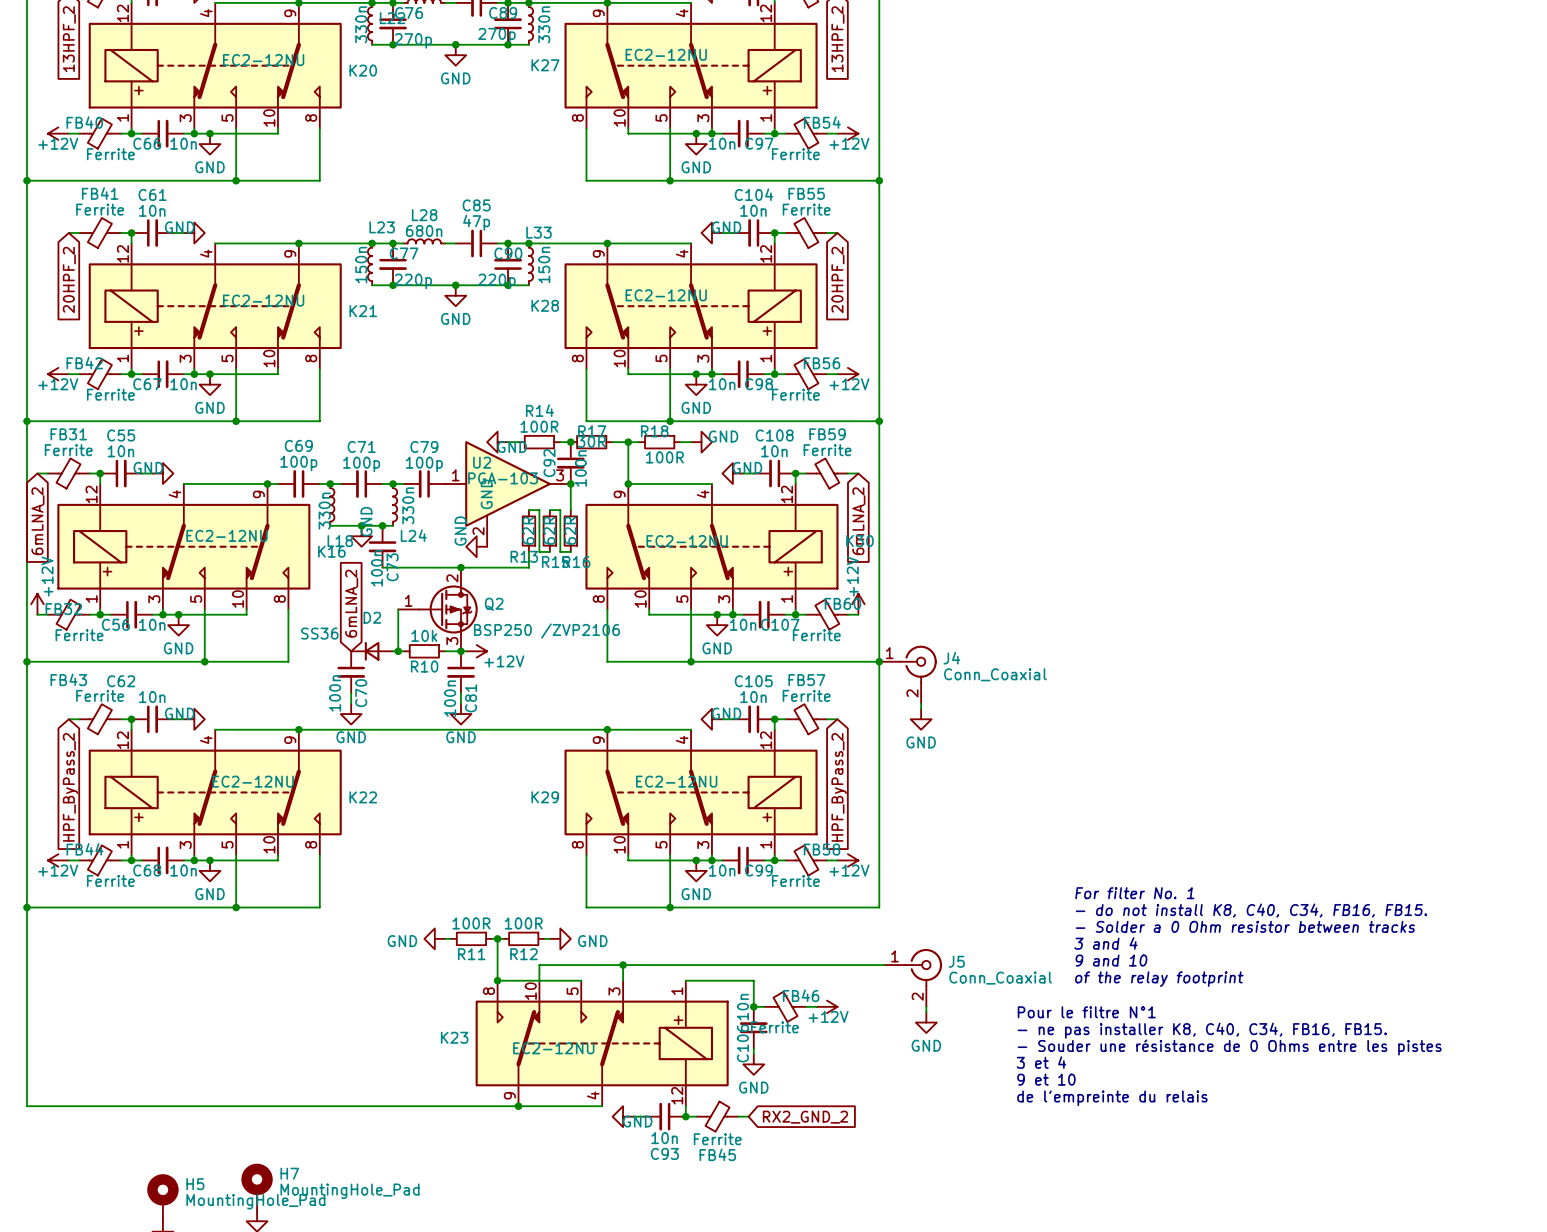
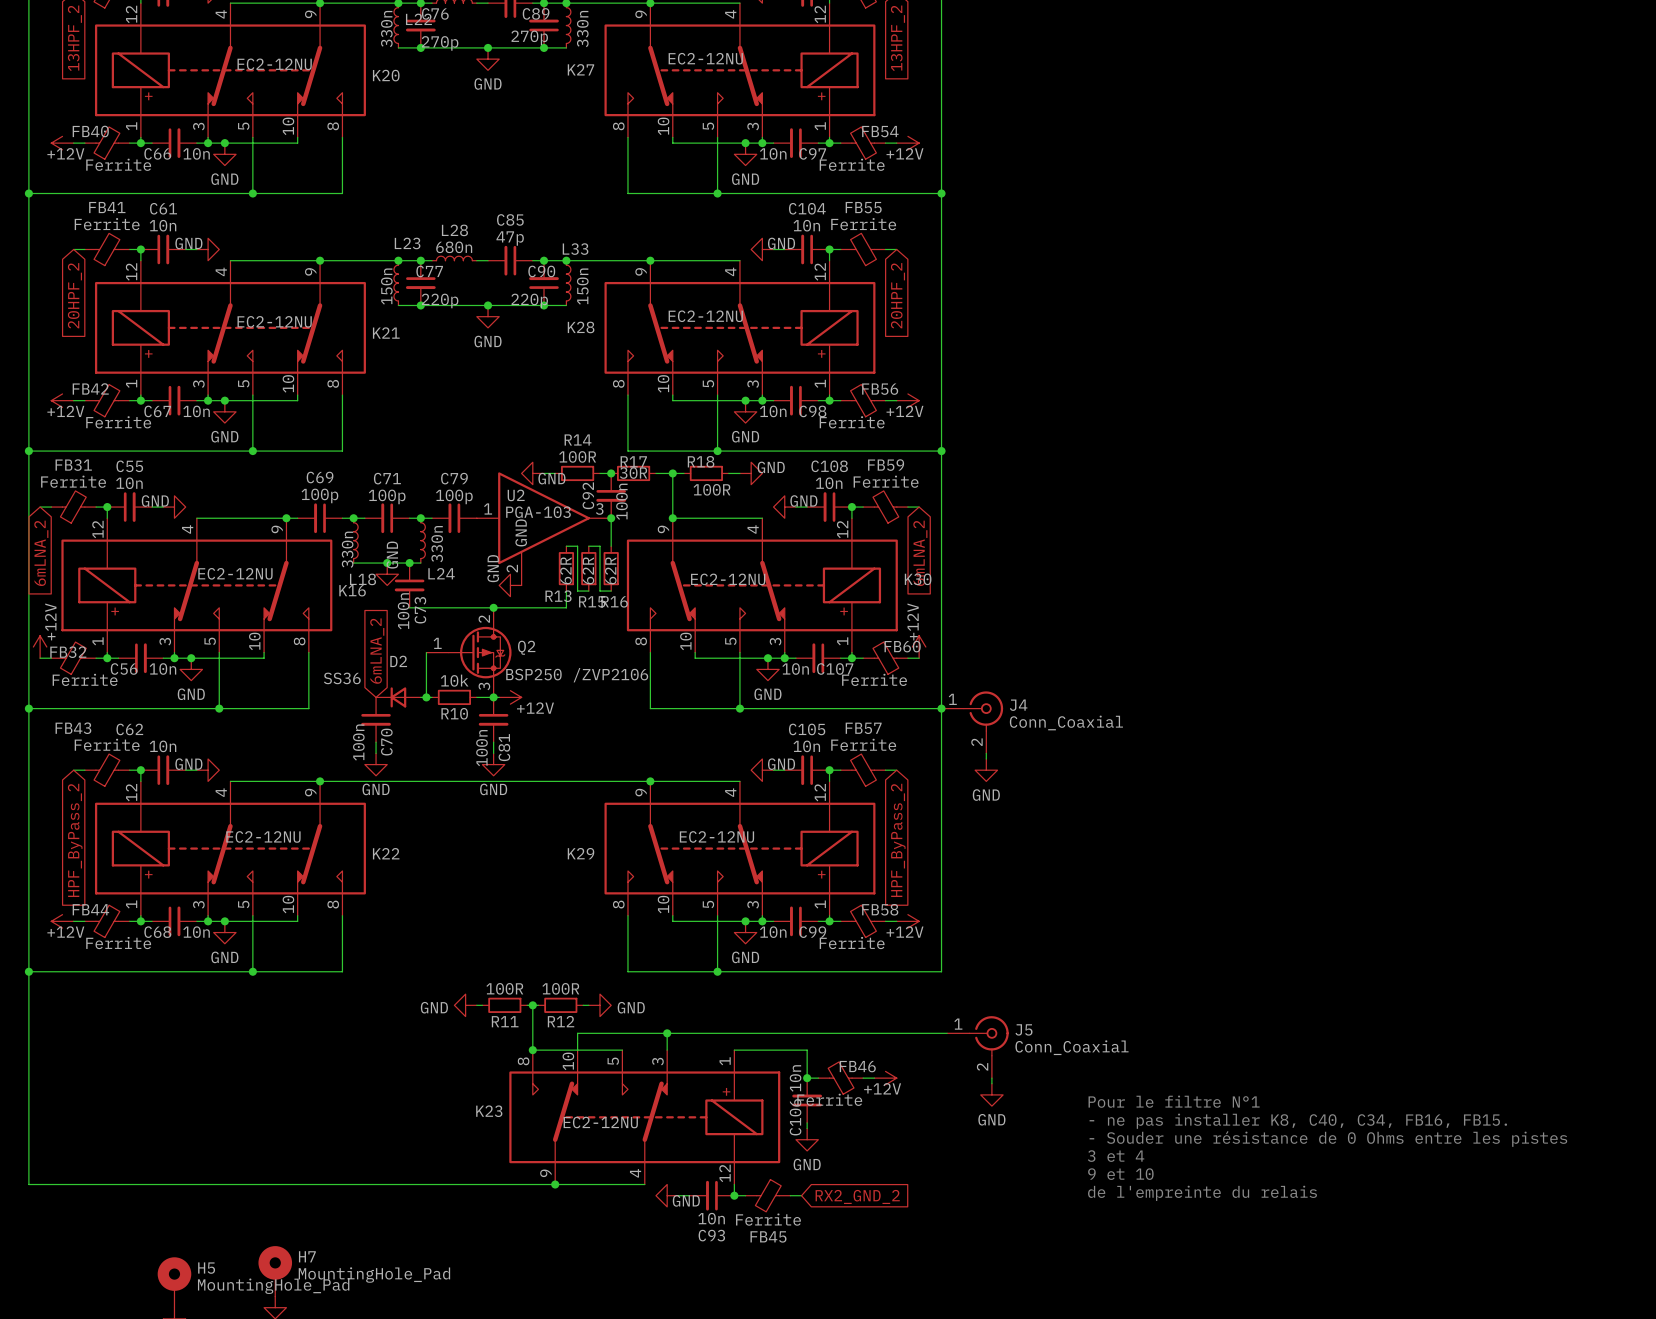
text: For filter No. 1 (1134, 893) -> none
text: - do not install K8, C40, C34, FB16, FB15. (1251, 910) -> none
text: - Solder a 0 Ohm resistor between tracks (1245, 926) -> none
text: 3 and 4 (1105, 943) -> none
text: 9 and 10 (1111, 960) -> none
text: of the relay footprint (1159, 979) -> none
text: Pour le filtre N°1 (1086, 1012) -> none
text: - ne pas installer K8, C40, C34, FB16, FB15. (1202, 1030) -> Pour le filtre N°1 (1174, 1101)
text: - Souder une résistance de 0 Ohms entre les pistes (1229, 1047) -> - ne pas installer K8, C40, C34, FB16, FB15. (1298, 1121)
text: 3 et 4 (1041, 1062) -> - Souder une résistance de 0 Ohms entre les pistes (1328, 1139)
text: 9 et 10 (1046, 1079) -> 3 et 4 (1116, 1156)
text: de l'empreinte du relais (1112, 1098) -> 9 et 10 (1120, 1174)
text: none -> de l'empreinte du relais (1202, 1193)

